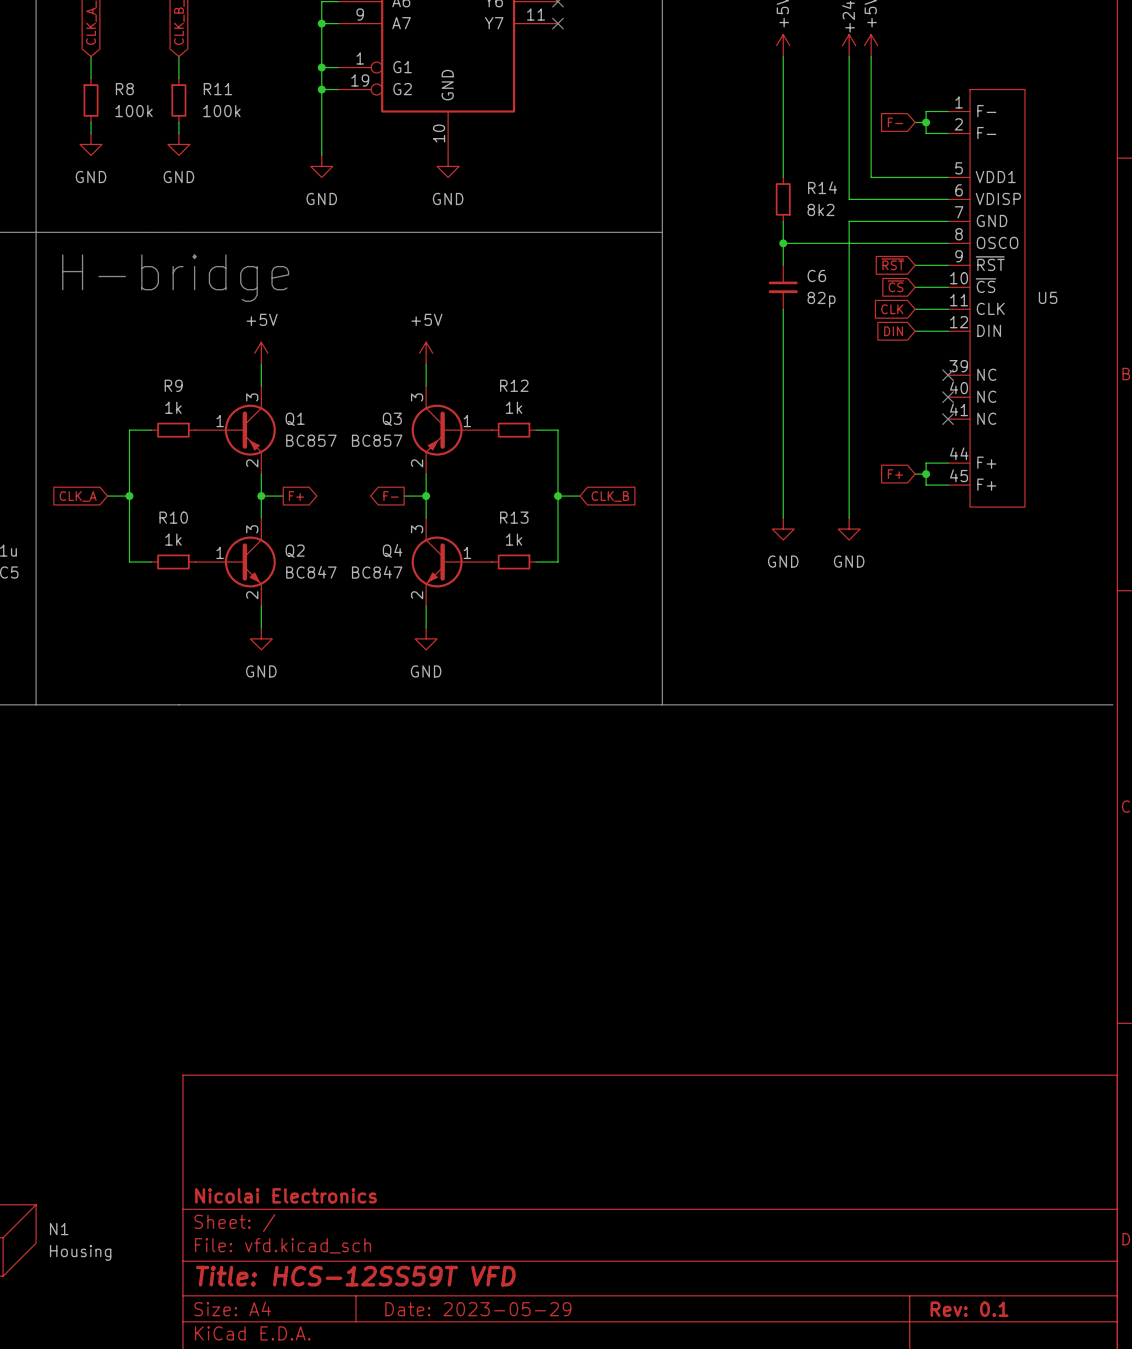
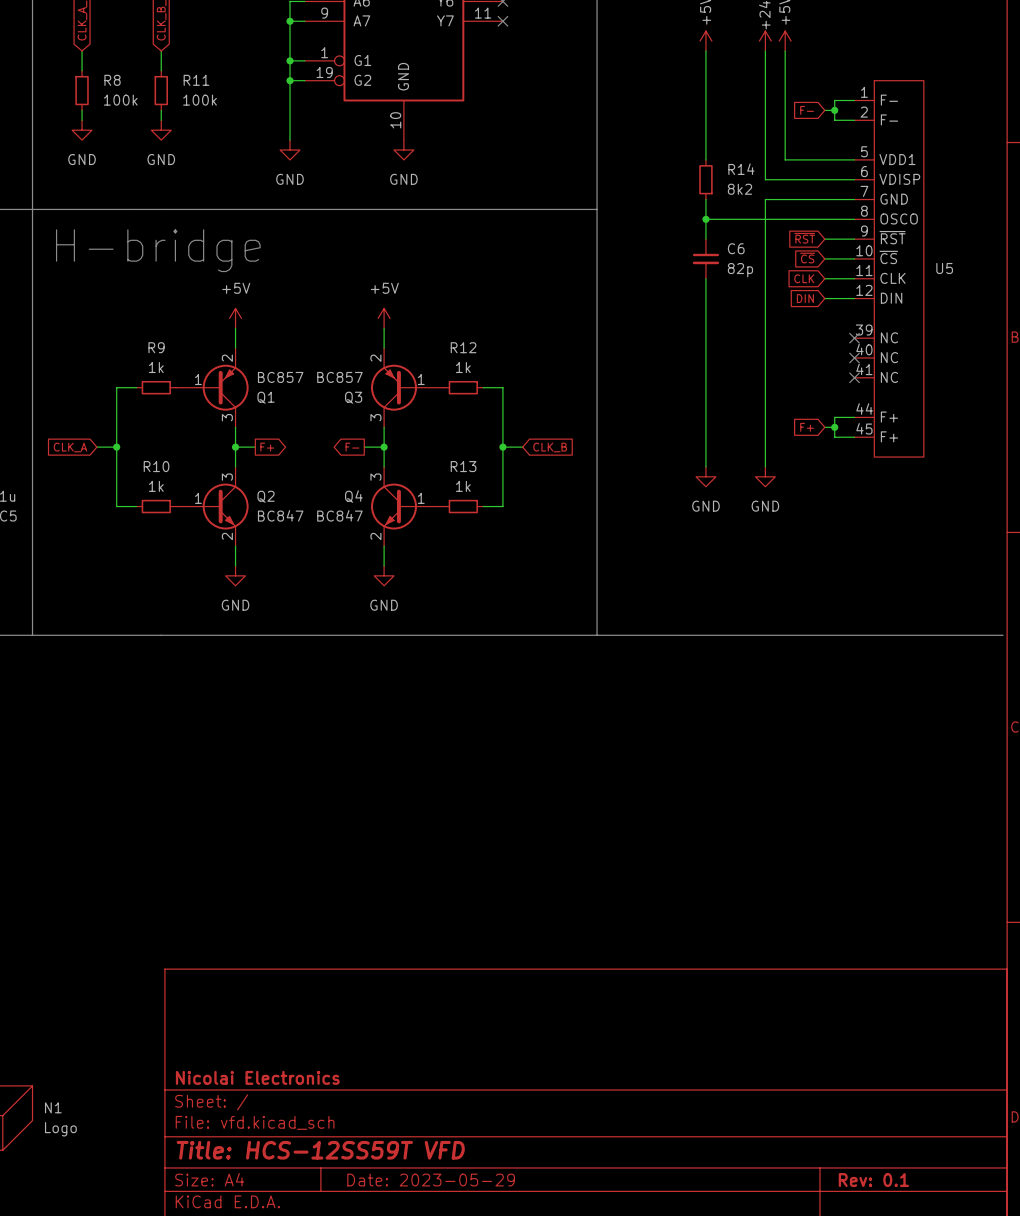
Q1 flip: as is (250, 430) -> up-down (225, 387)
Q3 flip: as is (437, 430) -> up-down (394, 387)
N1 value: Housing (80, 1252) -> Logo (60, 1129)

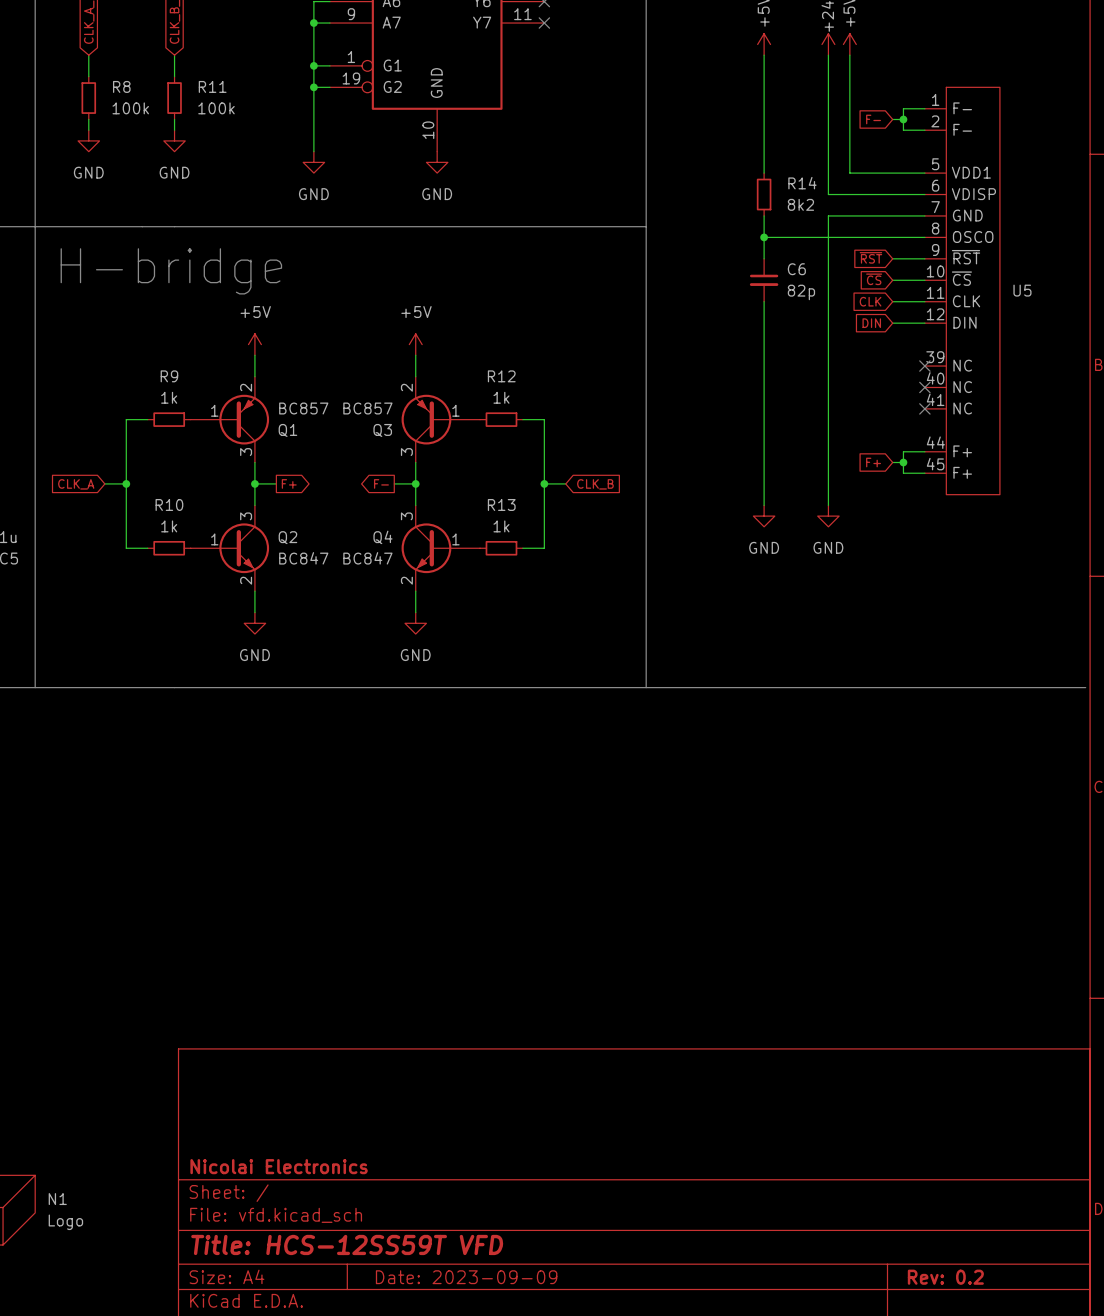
title block: Date: 2023-05-29 (431, 1180) -> Date: 2023-09-09 (466, 1277)
title block: Rev: 0.1 (873, 1180) -> Rev: 0.2 (945, 1277)

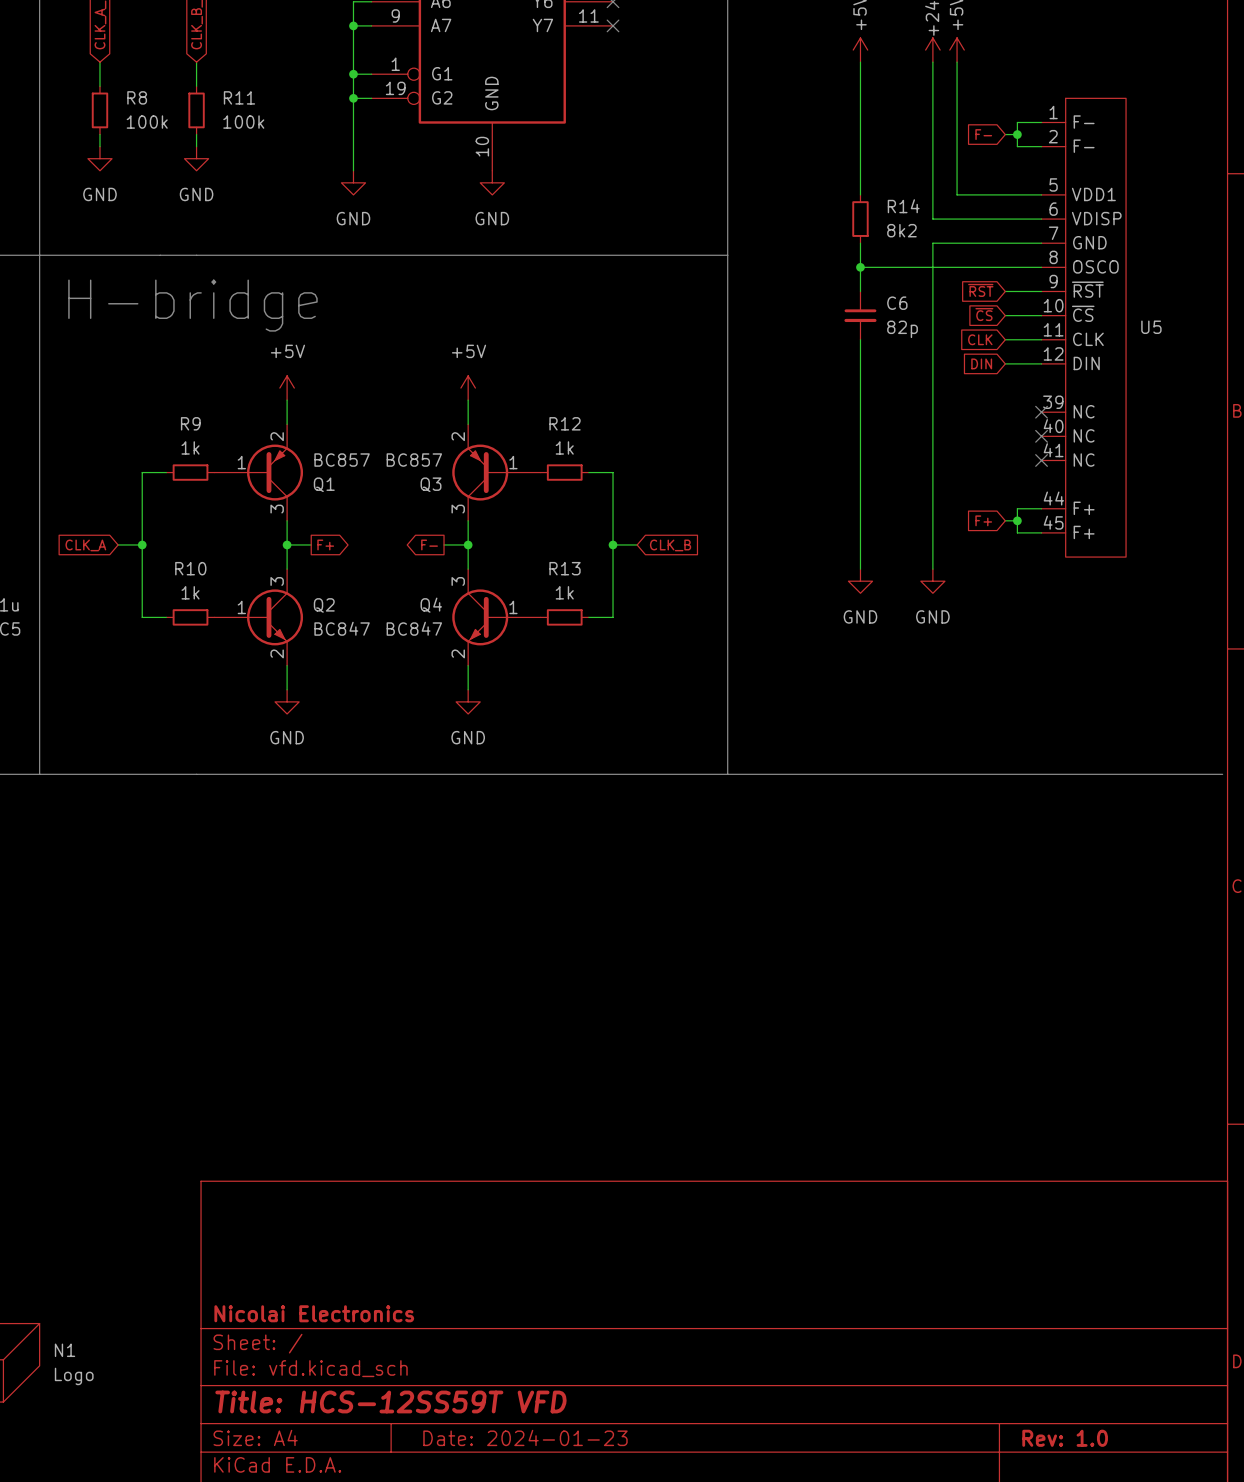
title block: Date: 2023-09-09 (466, 1277) -> Date: 2024-01-23 (525, 1437)
title block: Rev: 0.2 (945, 1277) -> Rev: 1.0 (1065, 1438)

